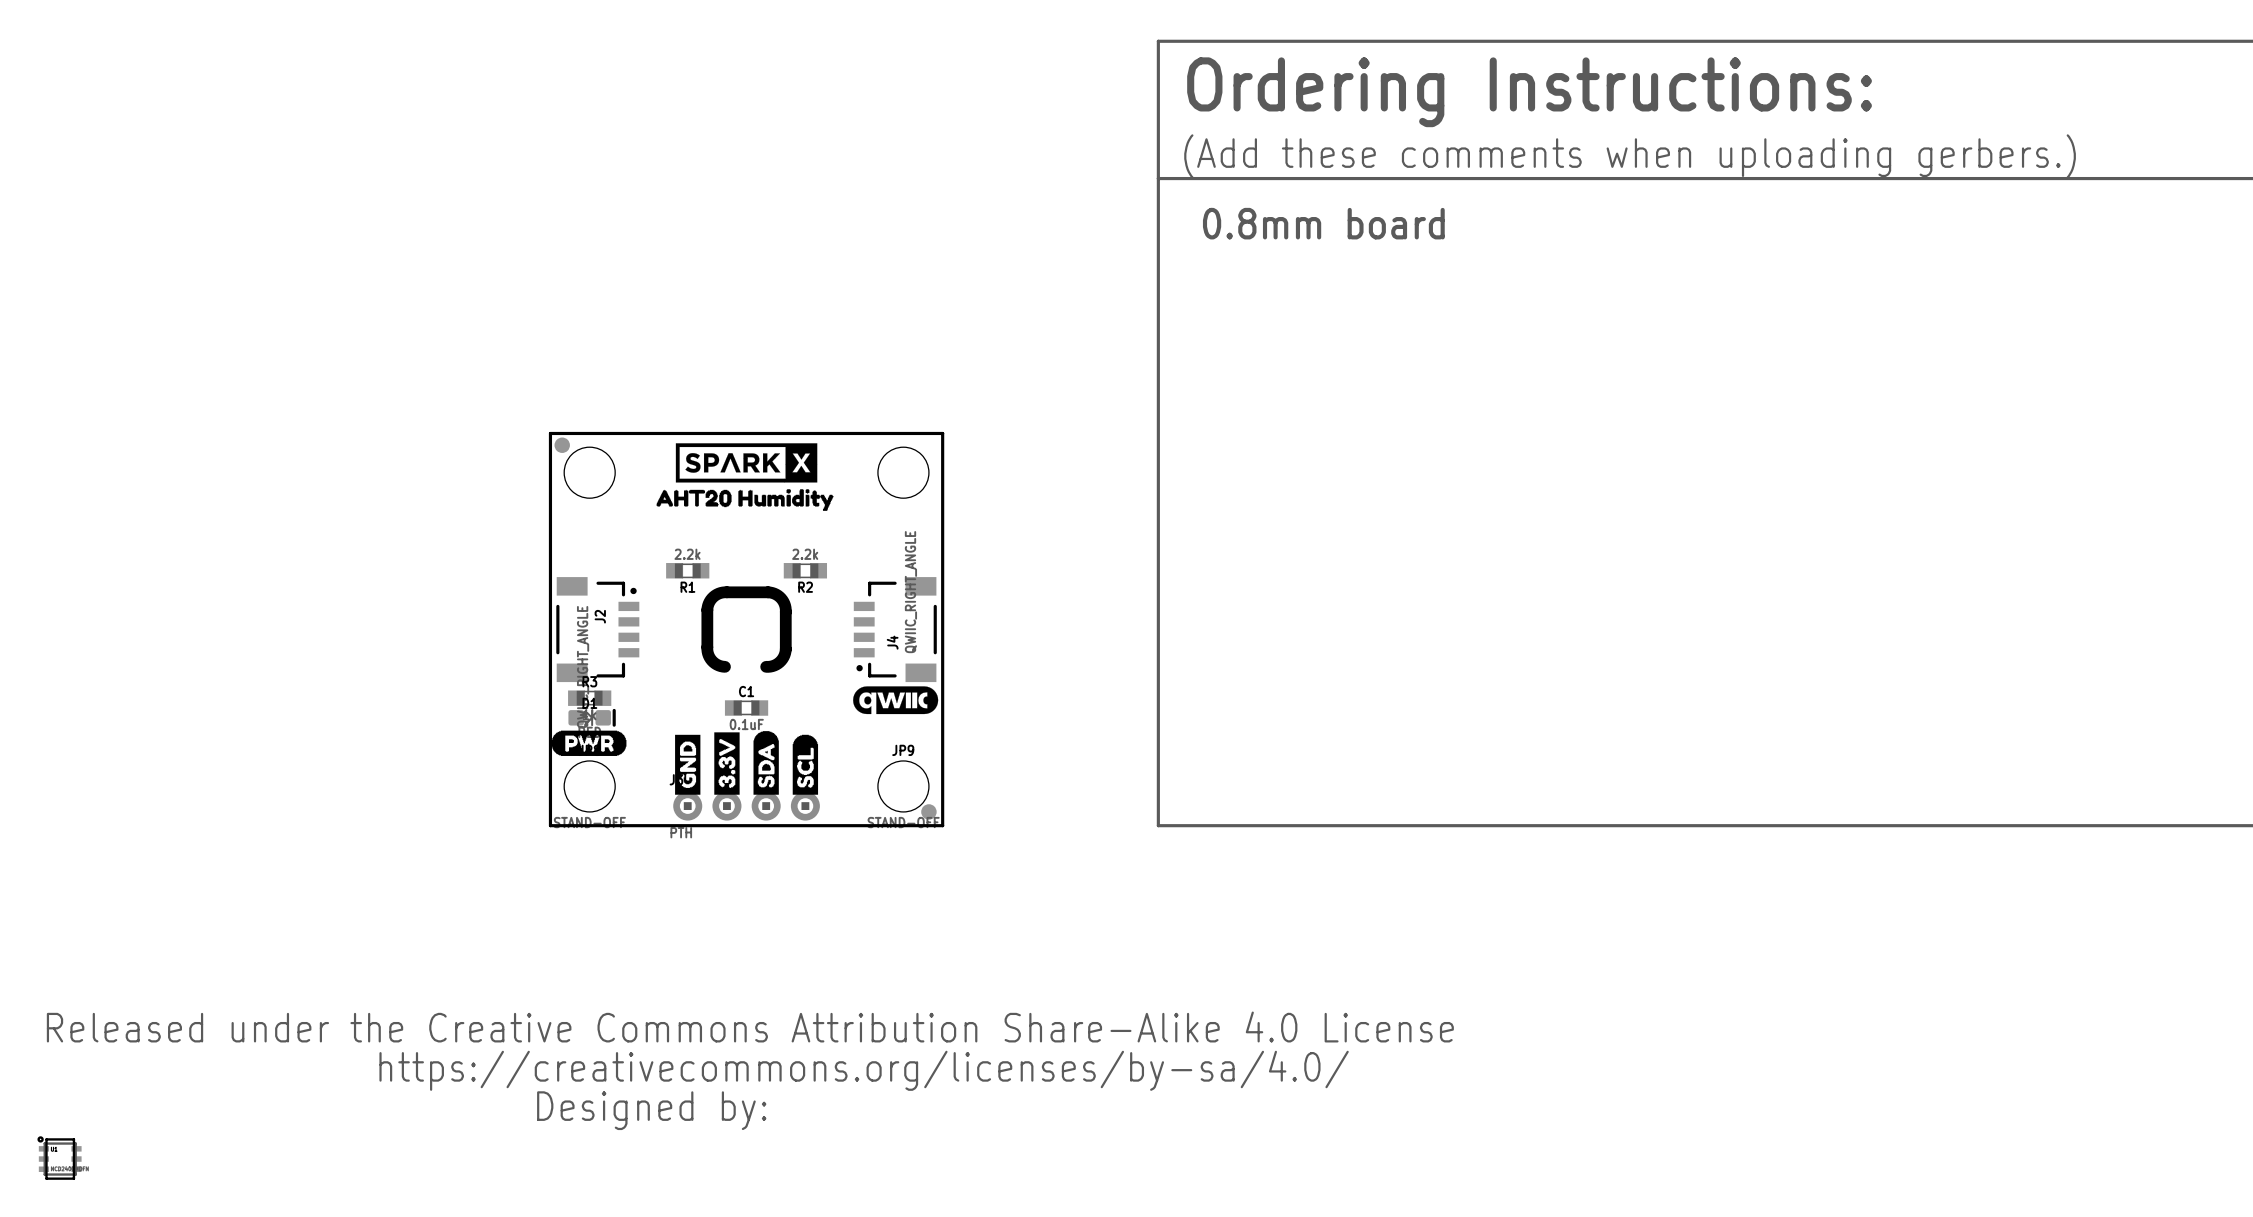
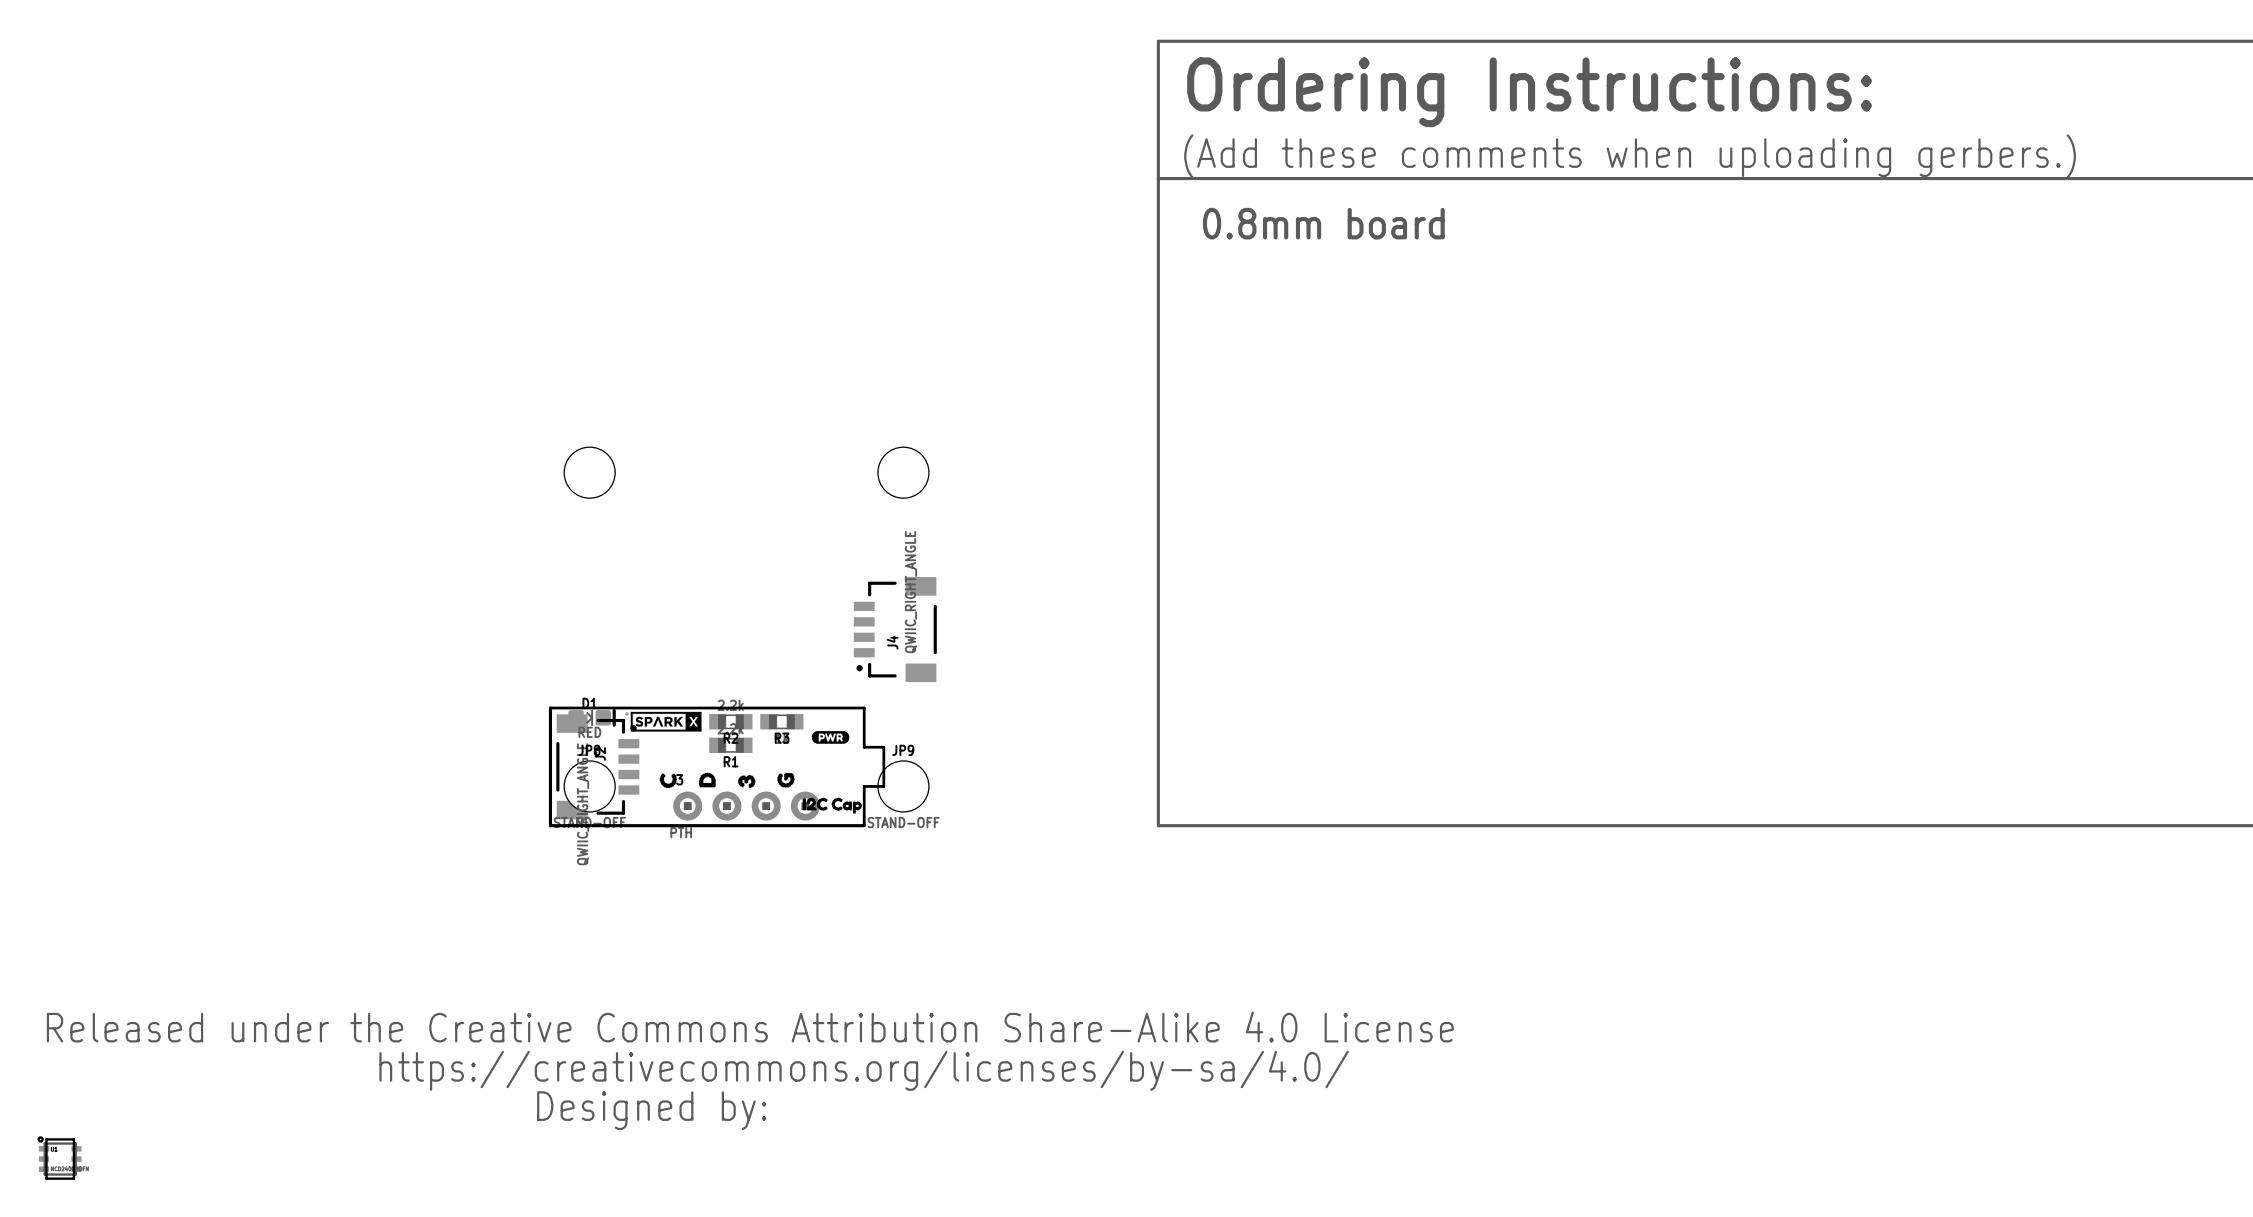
drawing: [656, 443, 834, 511] -> none
part: (562, 445) -> none
R1 position: (687, 570) -> (730, 745)
R2 position: (805, 570) -> (730, 721)
J2 position: (597, 629) -> (597, 766)
board edge: (724, 666) (713, 662) (707, 649) (707, 605) (715, 595) (724, 592) (770, 592) (777, 595) (783, 601) (785, 609) (785, 653) (778, 663) (766, 666) -> none
R3 name position: R3 (589, 681) -> R3 (782, 738)
drawing: [853, 686, 939, 715] -> none
R3 position: (589, 698) -> (781, 721)
board edge: (550, 708) (550, 433) (942, 433) (942, 825) (864, 825) -> (550, 708) (864, 708) (864, 747) (883, 747) (883, 786) (864, 786) (864, 825)
C1: 0.1uF (746, 708) -> none
drawing: none -> [630, 711, 702, 732]
part: none -> (626, 713)
drawing: [551, 730, 627, 756] -> none
drawing: [675, 731, 819, 795] -> none
drawing: none -> [811, 731, 850, 744]
drawing: none -> [699, 772, 716, 788]
drawing: none -> [659, 773, 678, 788]
drawing: none -> [777, 773, 862, 814]
drawing: none -> [738, 774, 756, 788]
part: (928, 811) -> none

